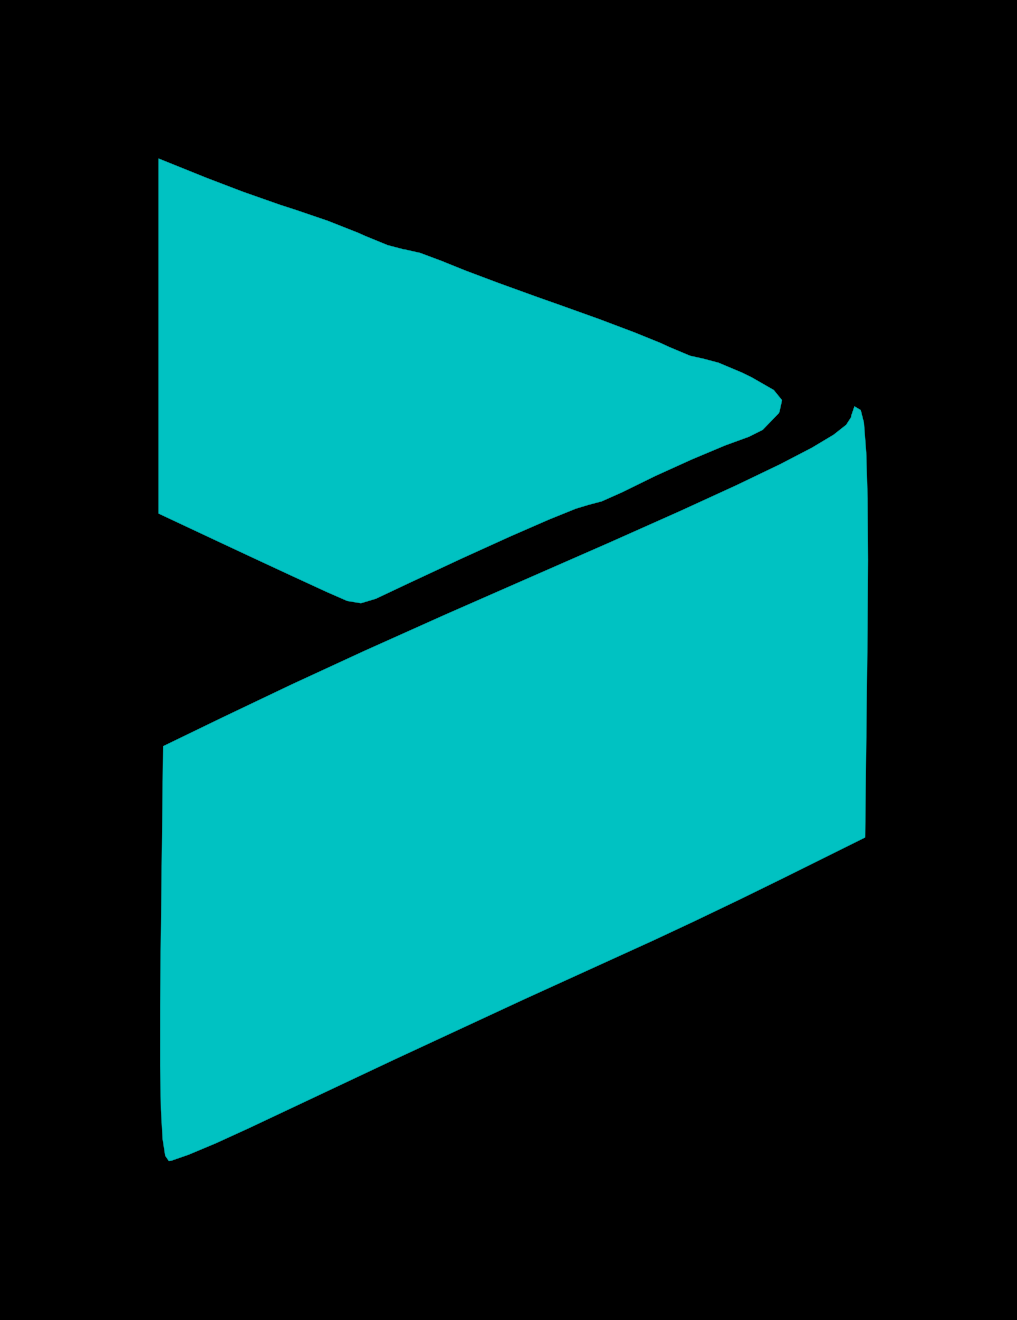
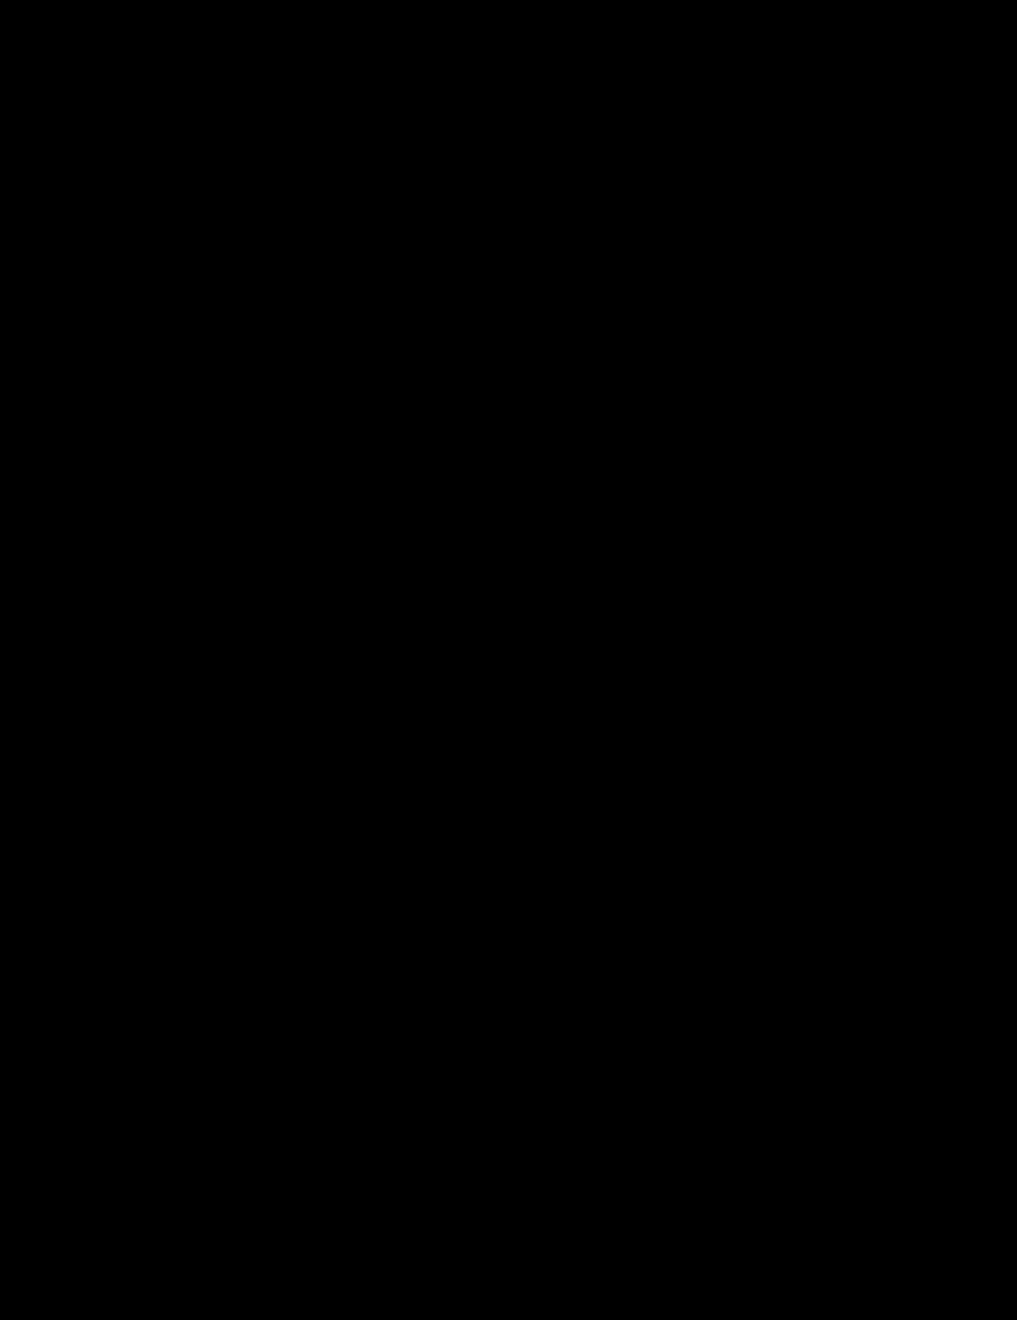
drawing: [158, 158, 869, 1162] -> none

